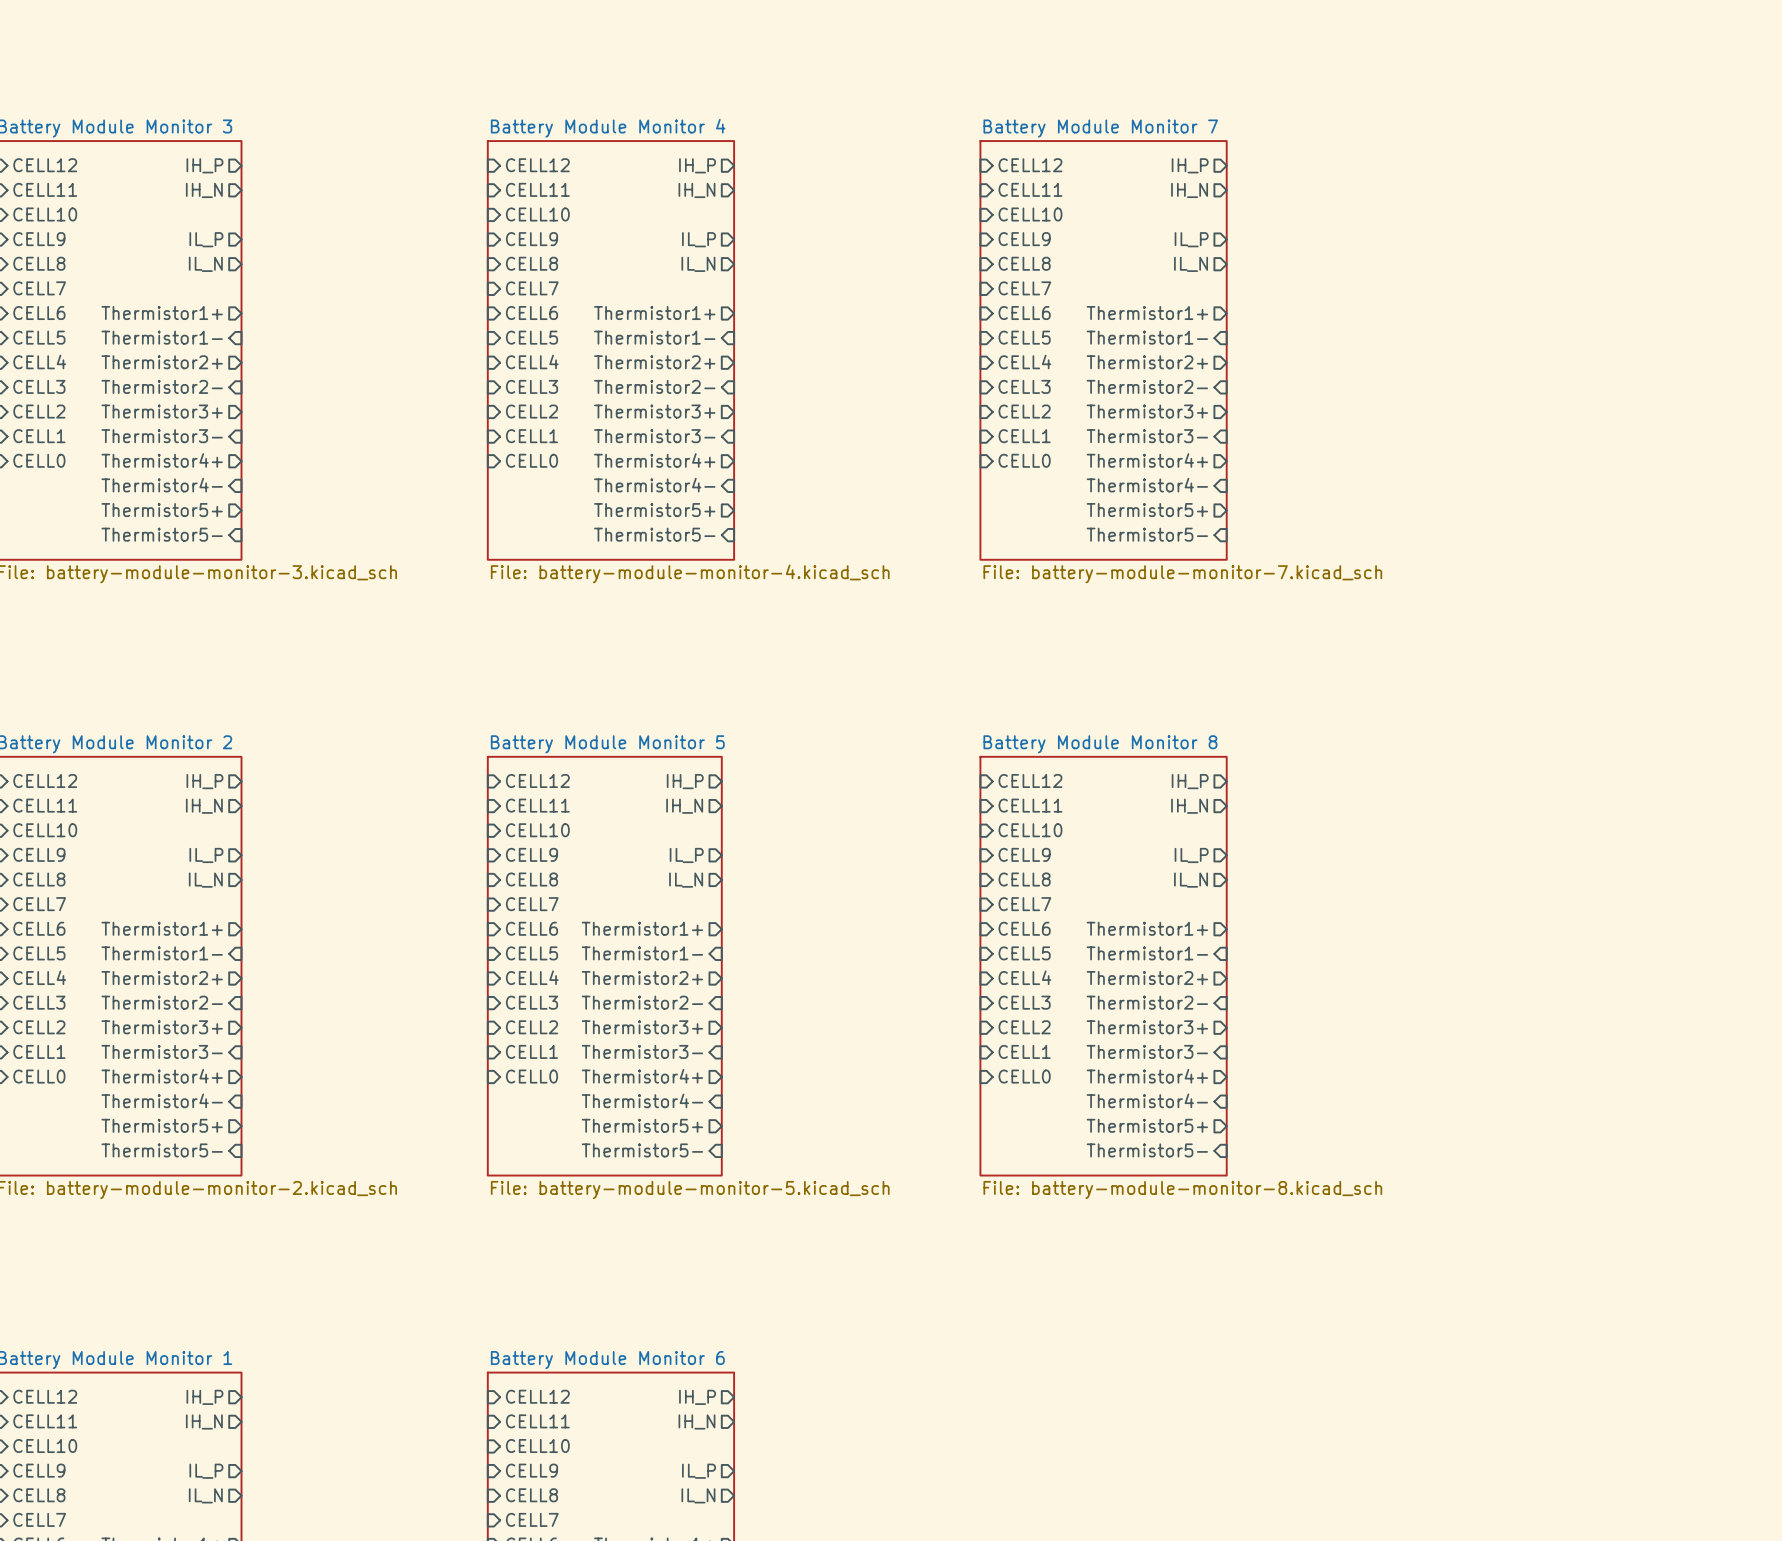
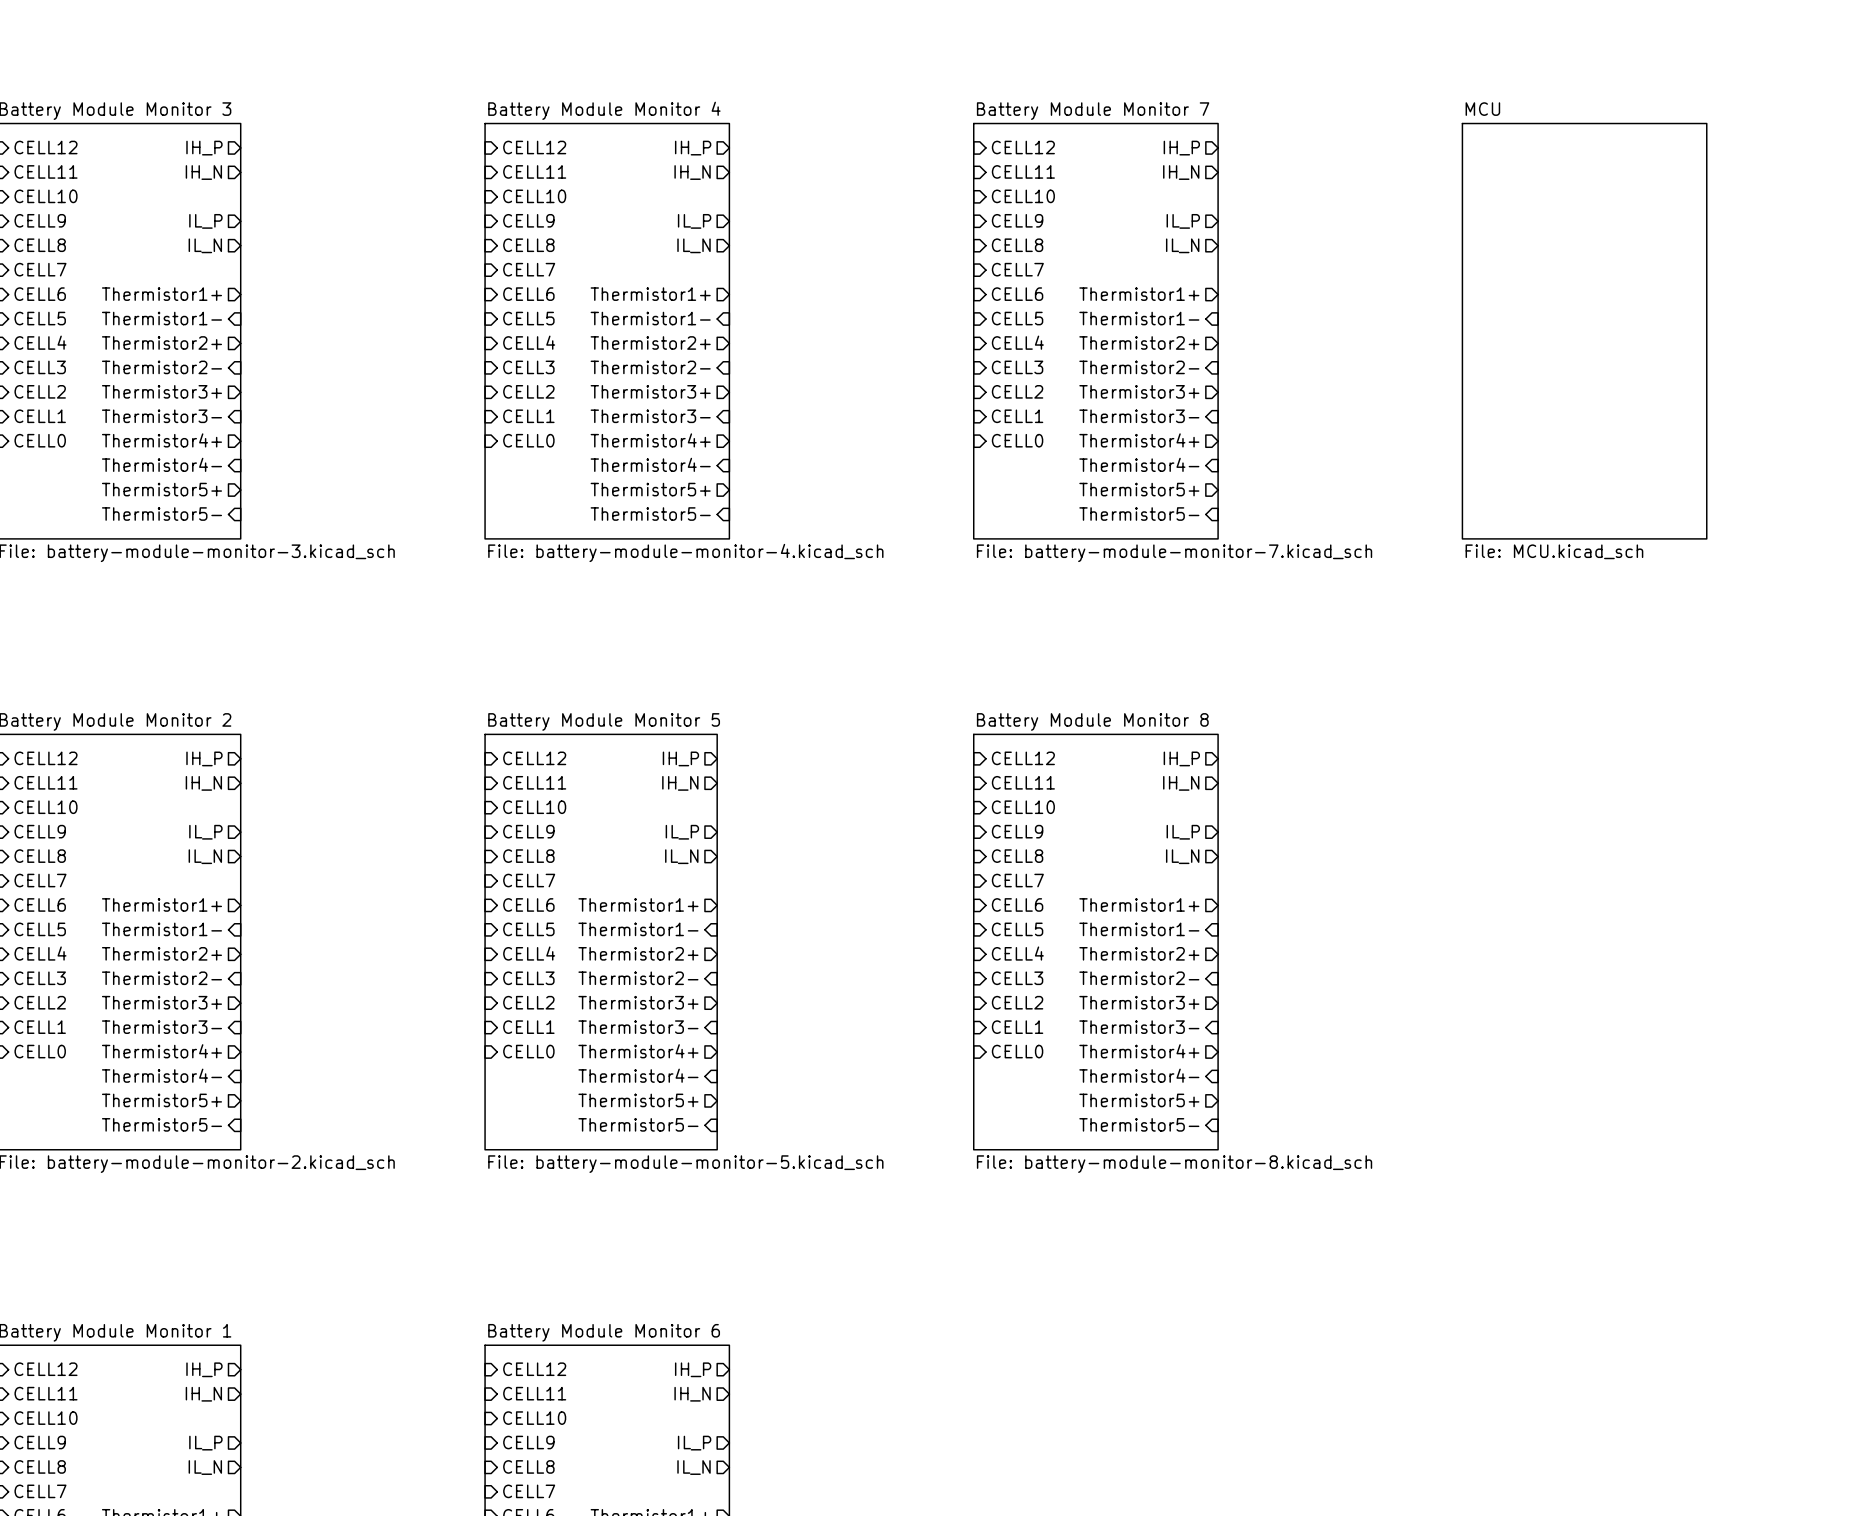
sheet MCU: none -> File: MCU.kicad_sch (1584, 331)

